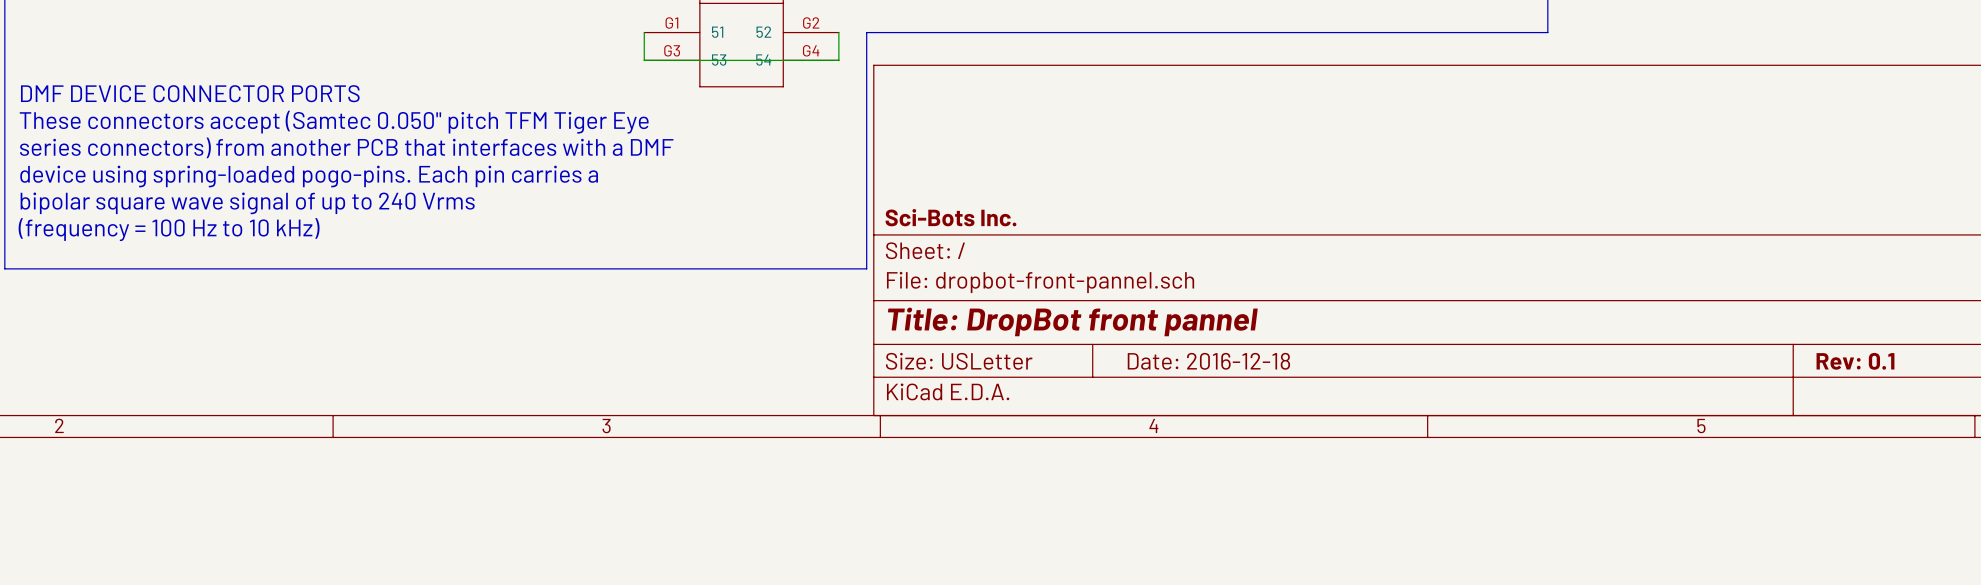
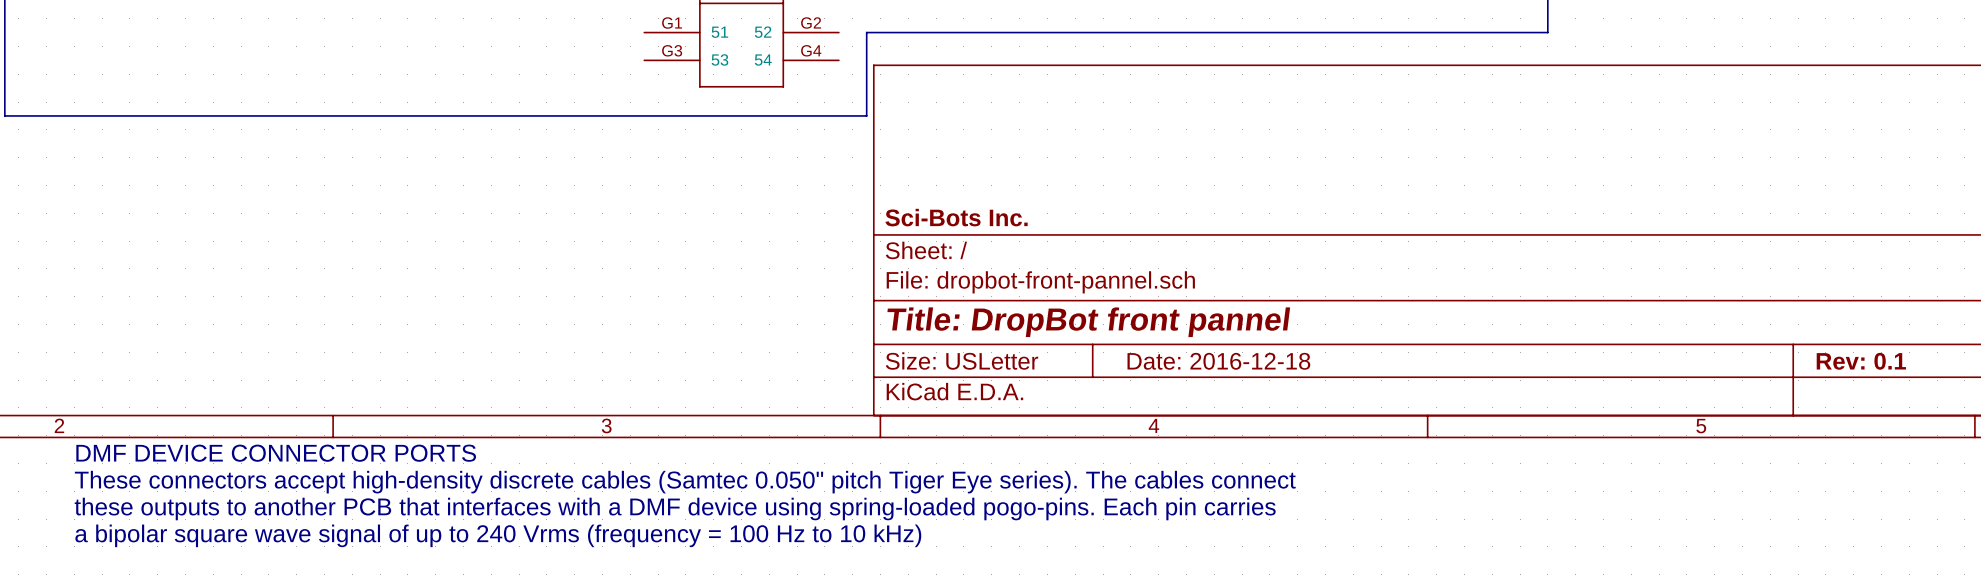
wire: (644, 32) (644, 60) (838, 60) (838, 32) -> none
text: DMF DEVICE CONNECTOR PORTS (190, 93) -> none
bus: (4, 115) (4, 268) (866, 268) (866, 115) -> (4, 115) (866, 115)
text: These connectors accept (Samtec 0.050" pitch TFM Tiger Eye (334, 122) -> none
text: series connectors) from another PCB that interfaces with a DMF (346, 147) -> none
text: device using spring-loaded pogo-pins. Each pin carries a (309, 176) -> none
text: bipolar square wave signal of up to 240 Vrms (247, 203) -> none
text: (frequency = 100 Hz to 10 kHz) (169, 229) -> none
text: none -> DMF DEVICE CONNECTOR PORTS (276, 453)
text: none -> These connectors accept high-density discrete cables (Samtec 0.050" pitch Tiger Eye series). The cables connect (685, 482)
text: none -> these outputs to another PCB that interfaces with a DMF device using spring-loaded pogo-pins. Each pin carries (675, 508)
text: none -> a bipolar square wave signal of up to 240 Vrms (frequency = 100 Hz to 10 kHz) (498, 535)

